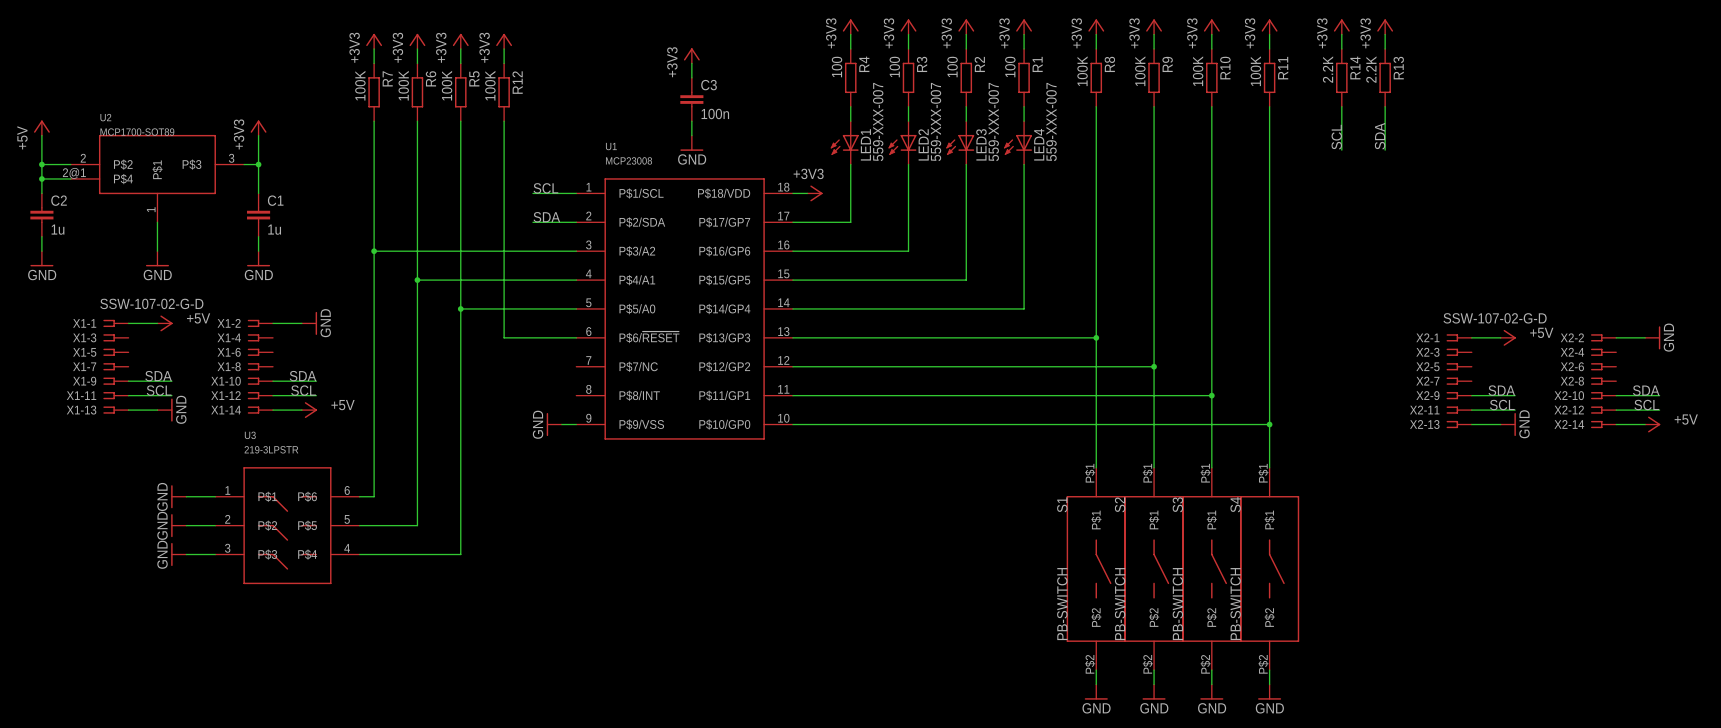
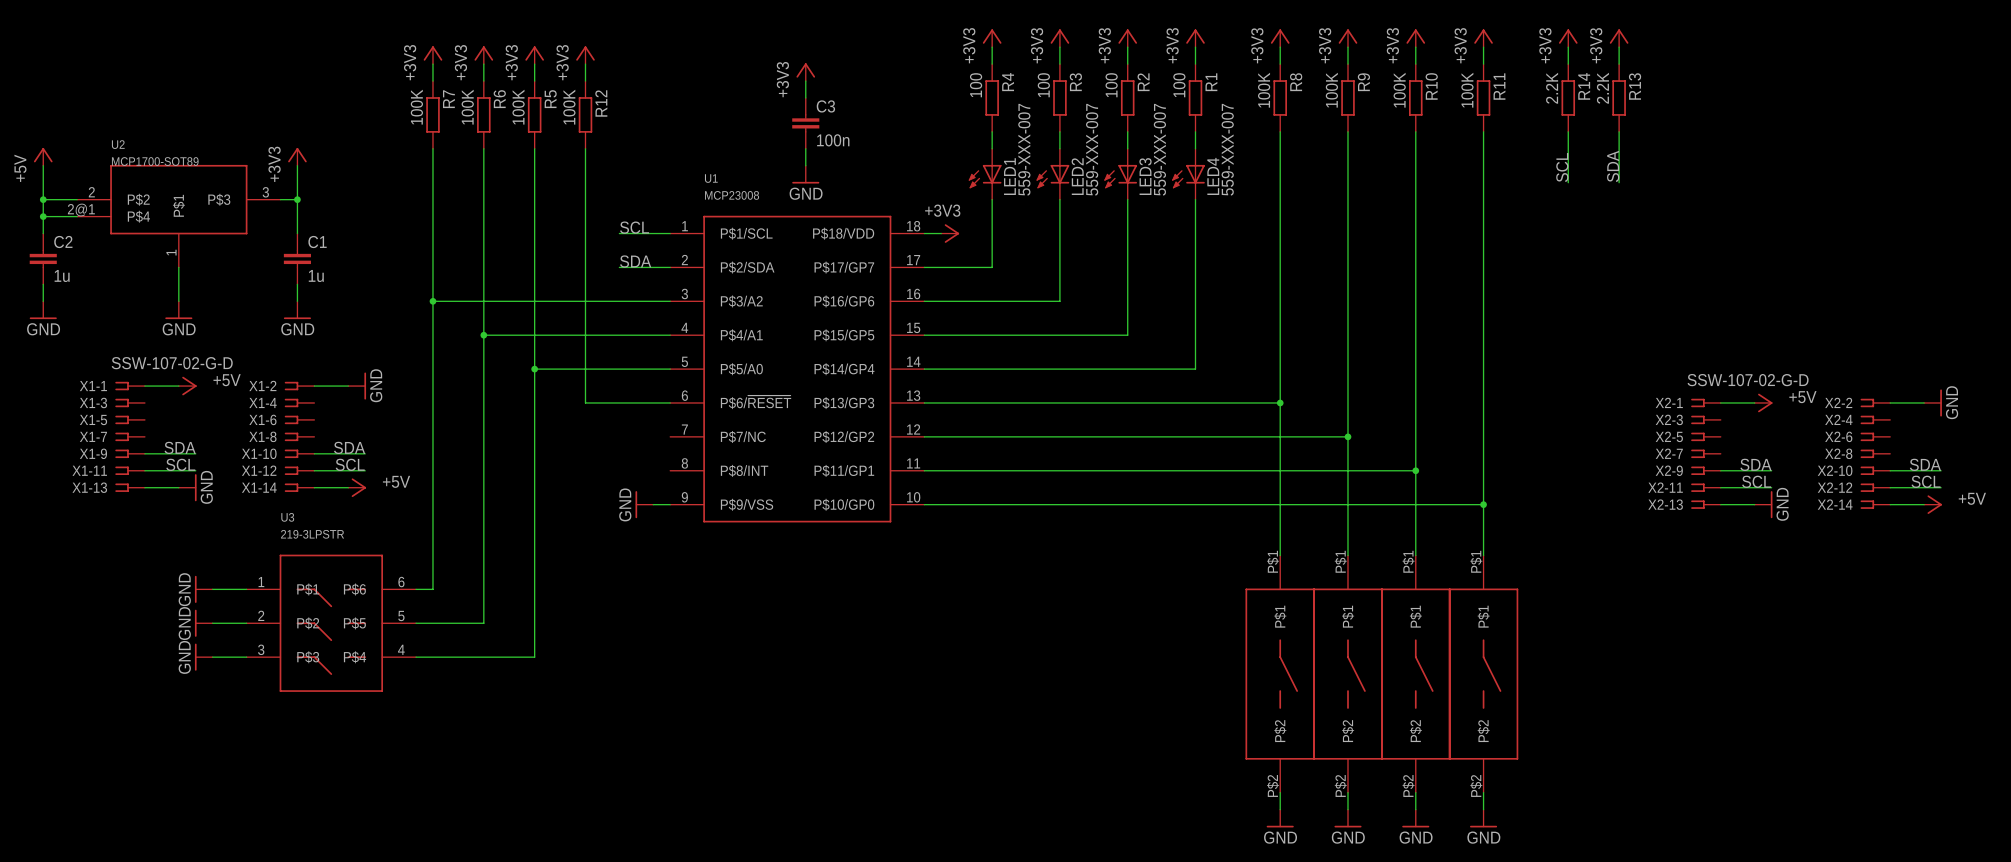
S1 name: S1 (1062, 504) -> none
S2 name: S2 (1120, 504) -> none
S3 name: S3 (1177, 504) -> none
S4 name: S4 (1235, 504) -> none
S1 value: PB-SWITCH (1062, 604) -> none
S2 value: PB-SWITCH (1120, 604) -> none
S3 value: PB-SWITCH (1177, 604) -> none
S4 value: PB-SWITCH (1235, 604) -> none

